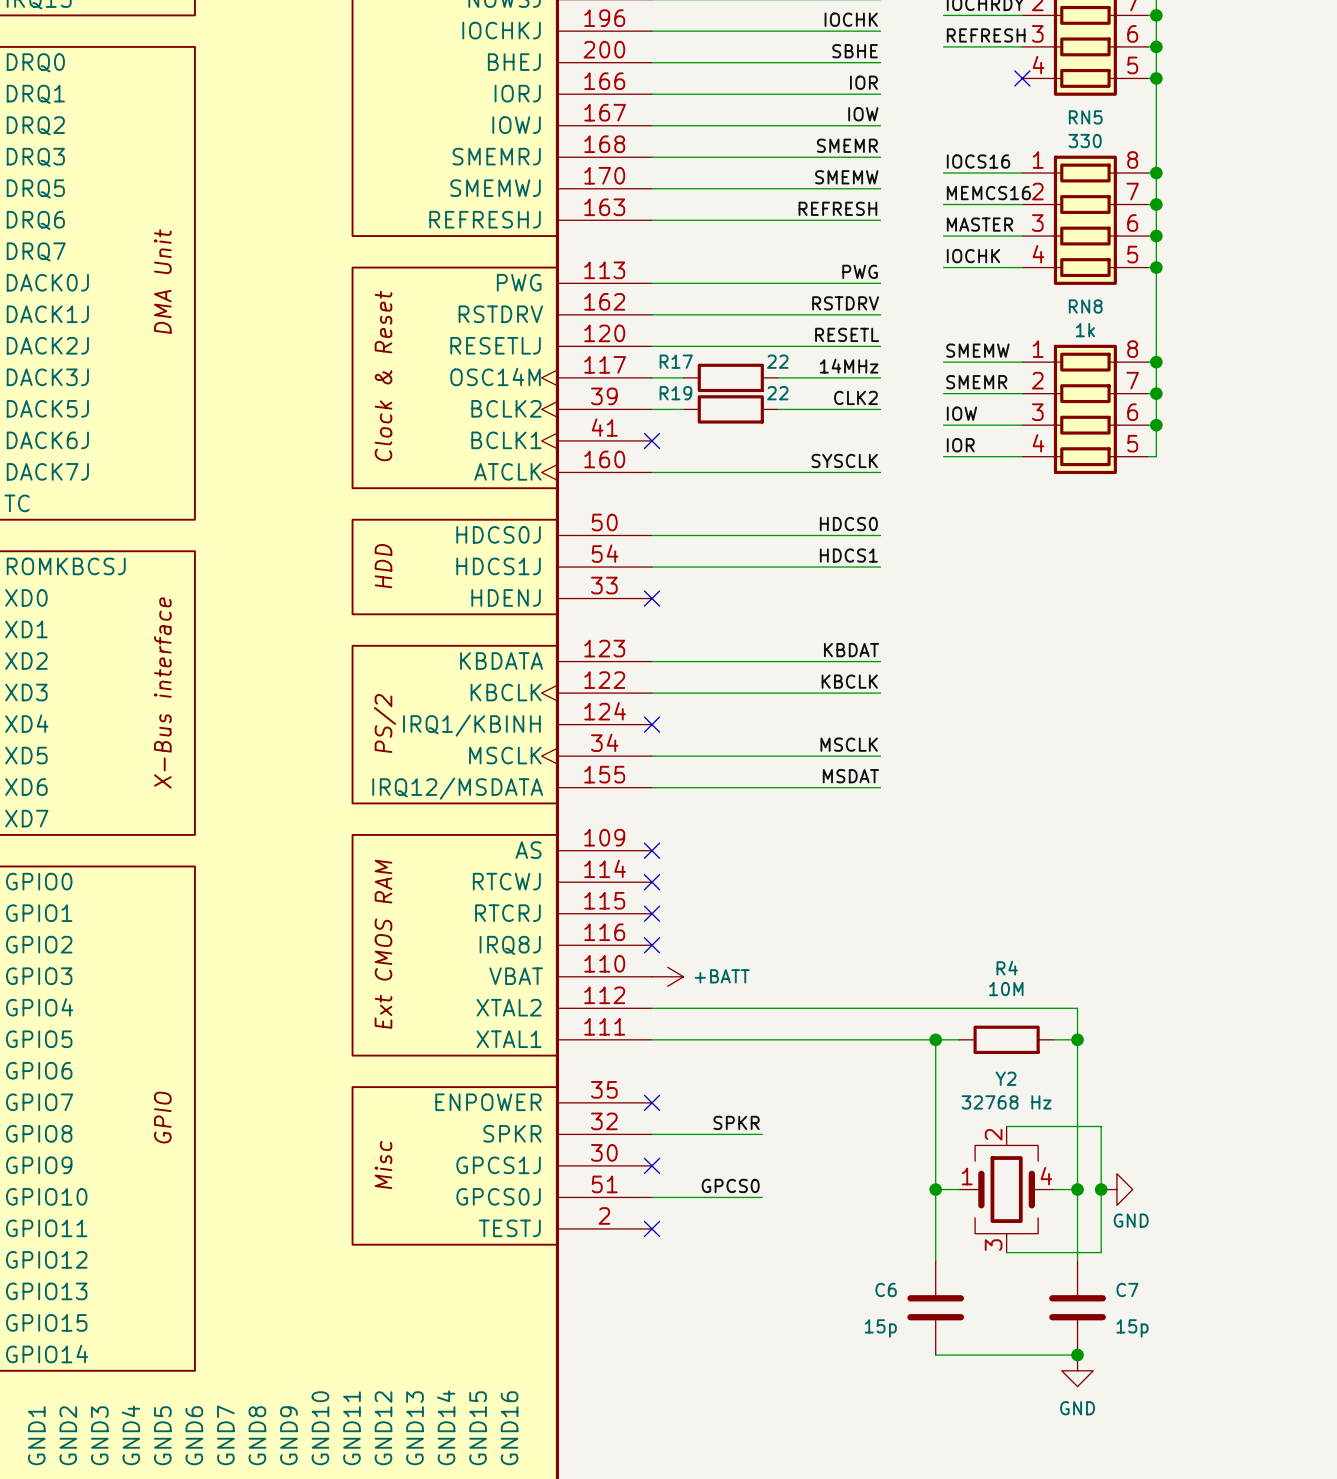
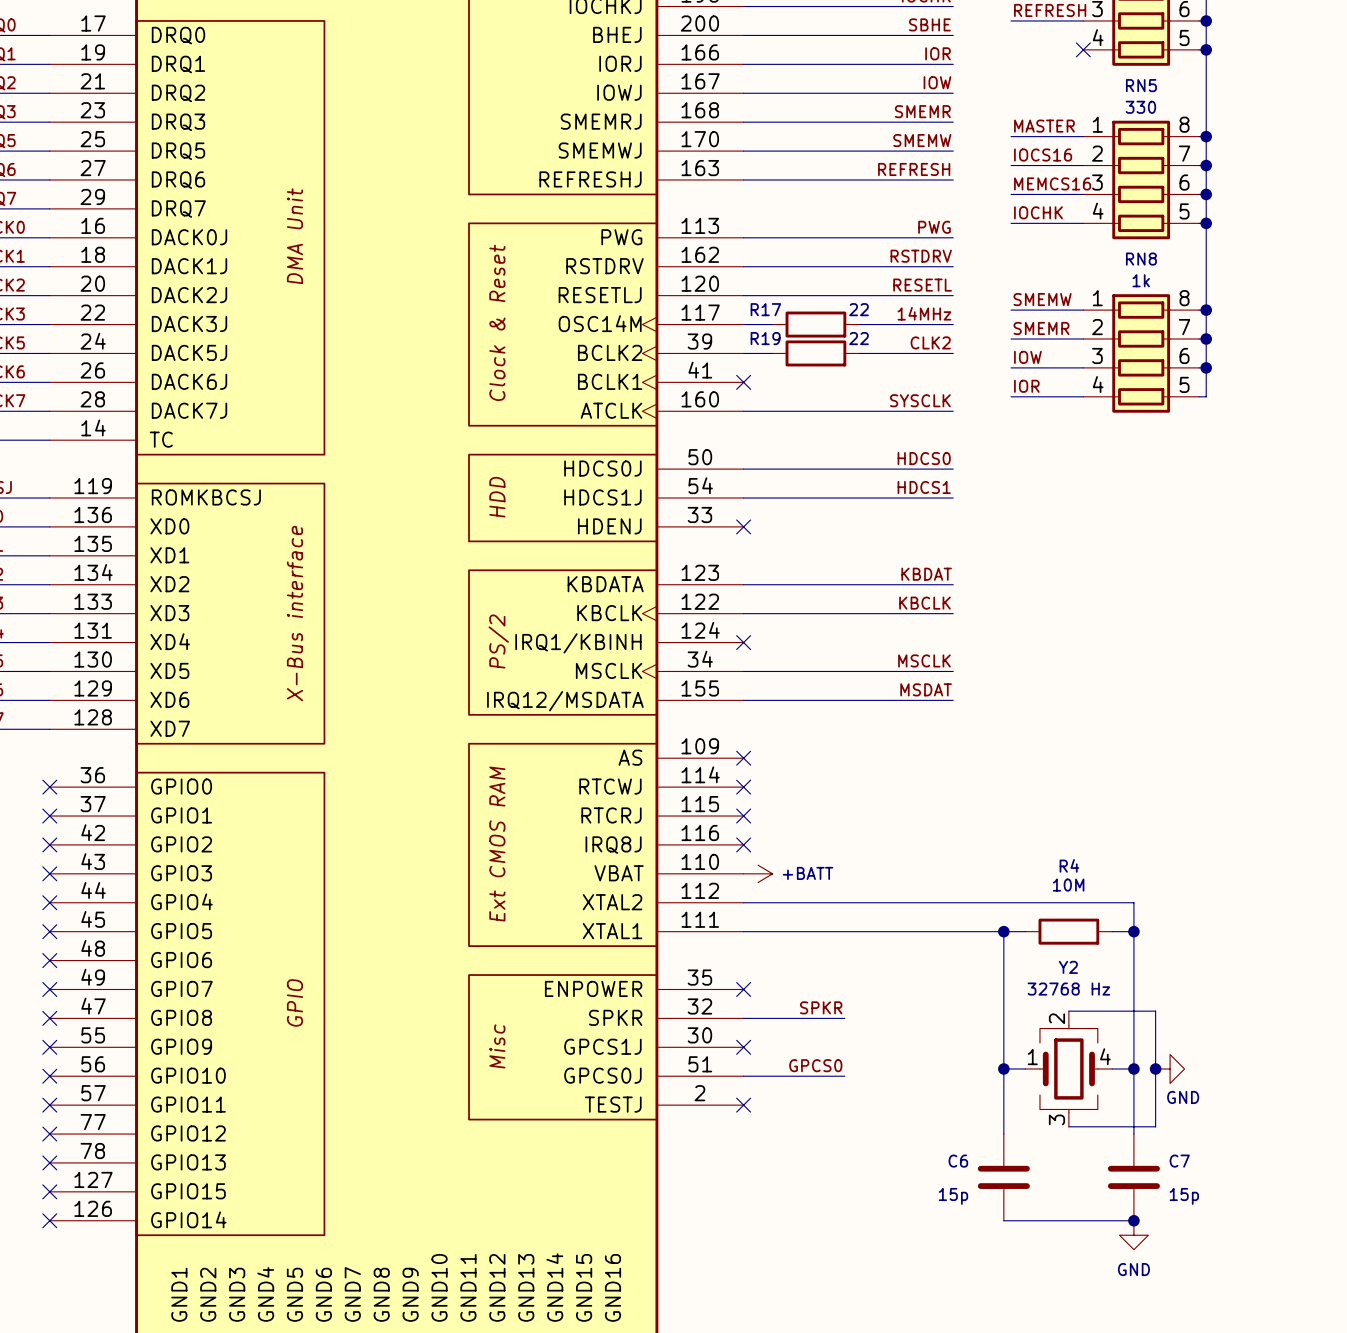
label: IOCS16 (978, 161) -> MASTER (1044, 126)
label: MEMCS16 (988, 193) -> IOCS16 (1043, 155)
label: MASTER (979, 224) -> MEMCS16 (1052, 183)

